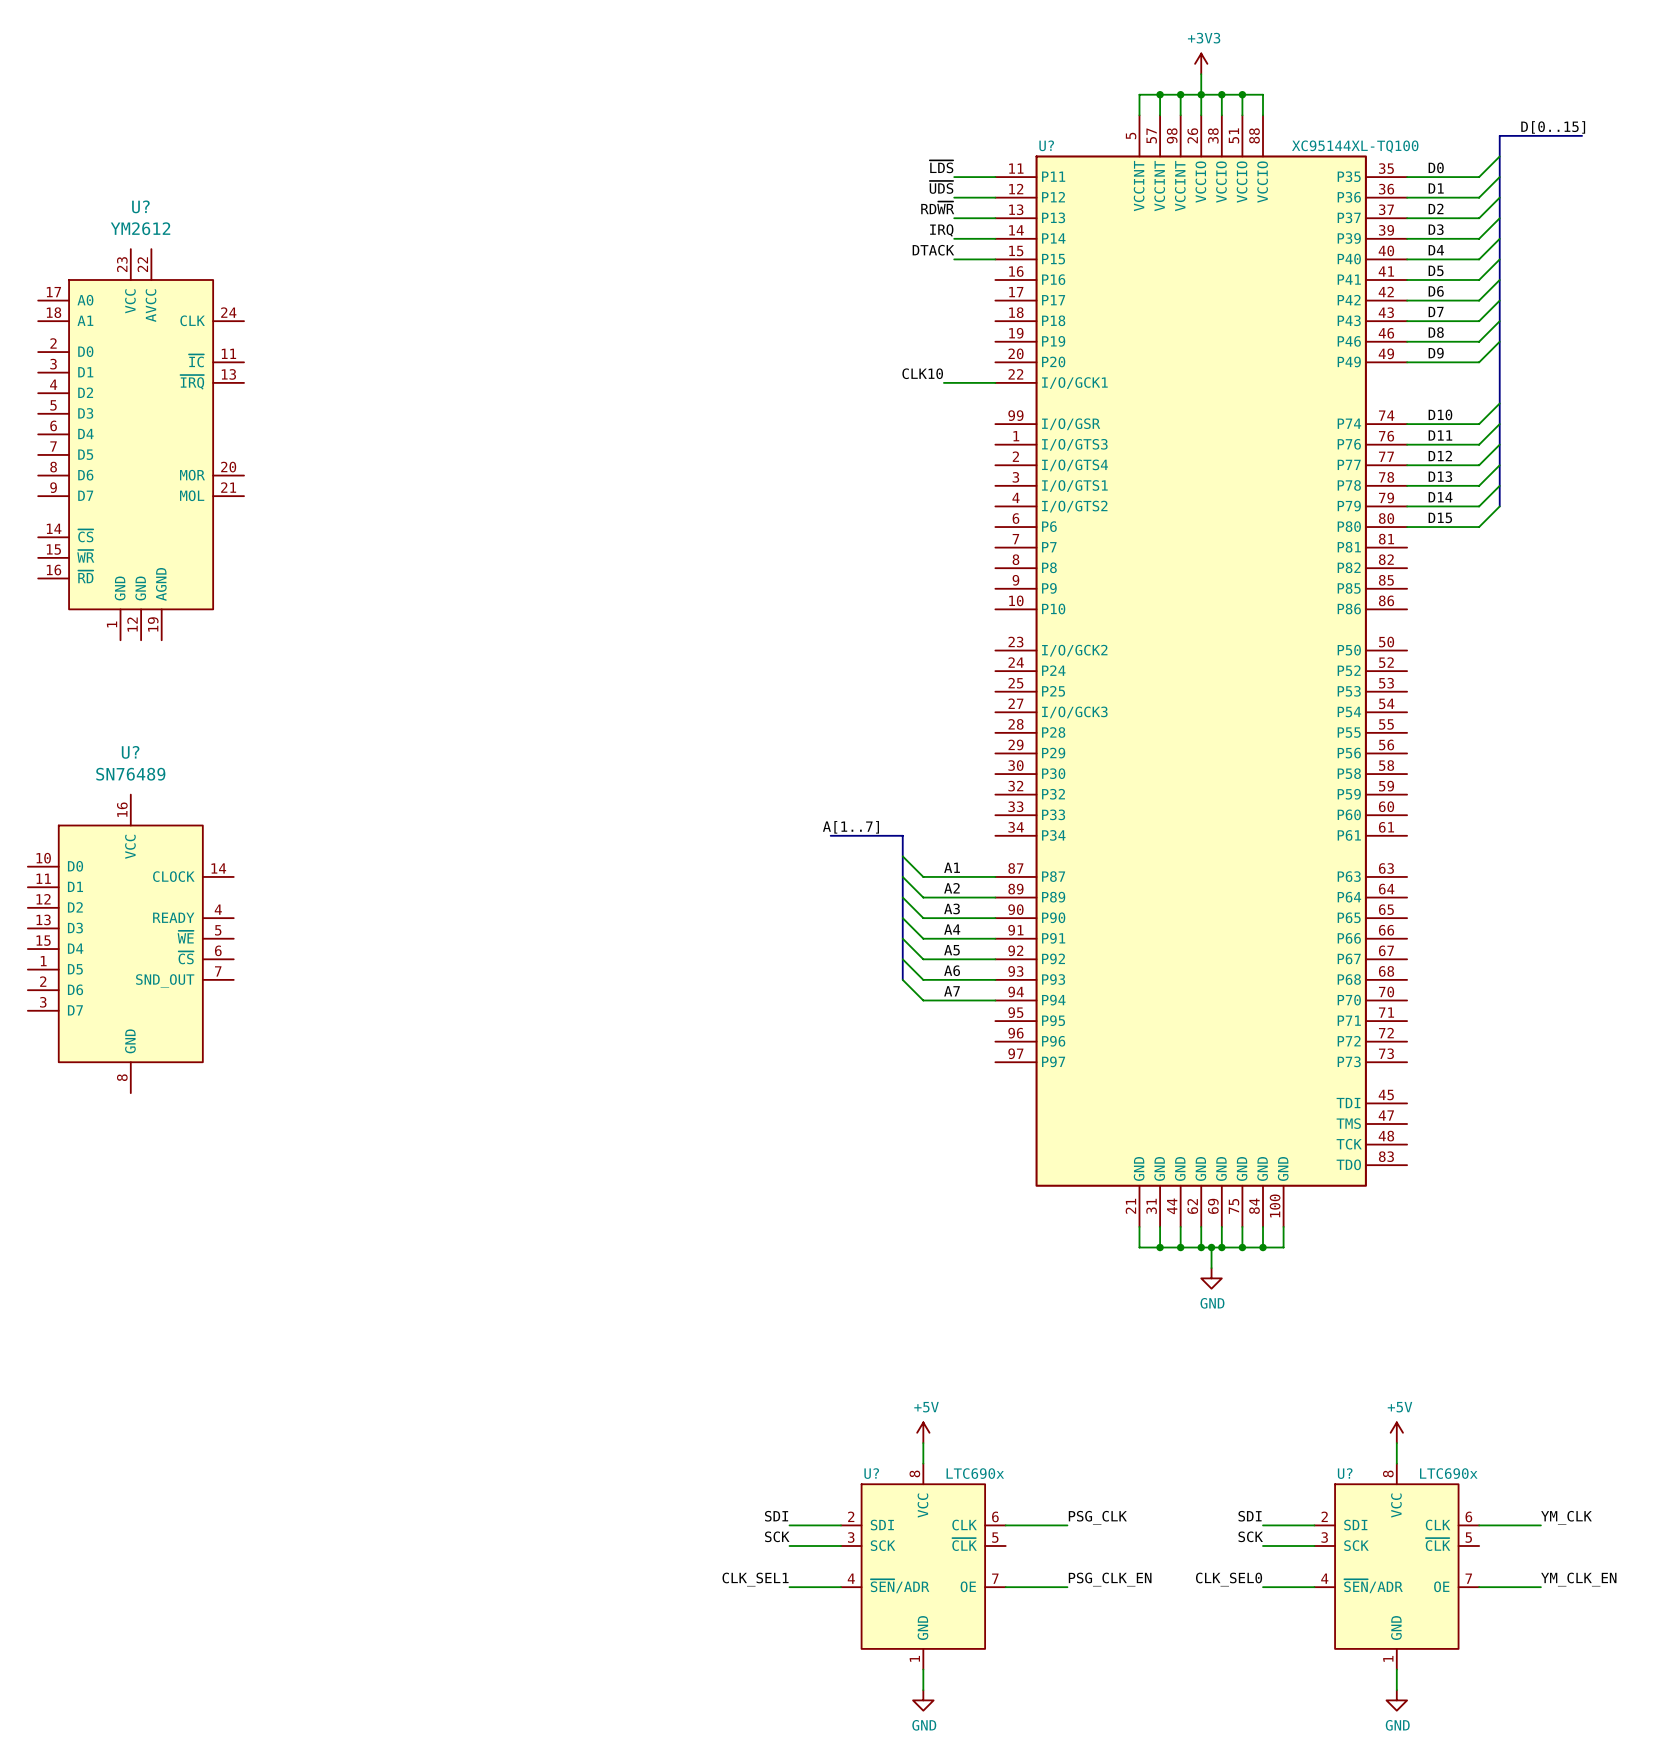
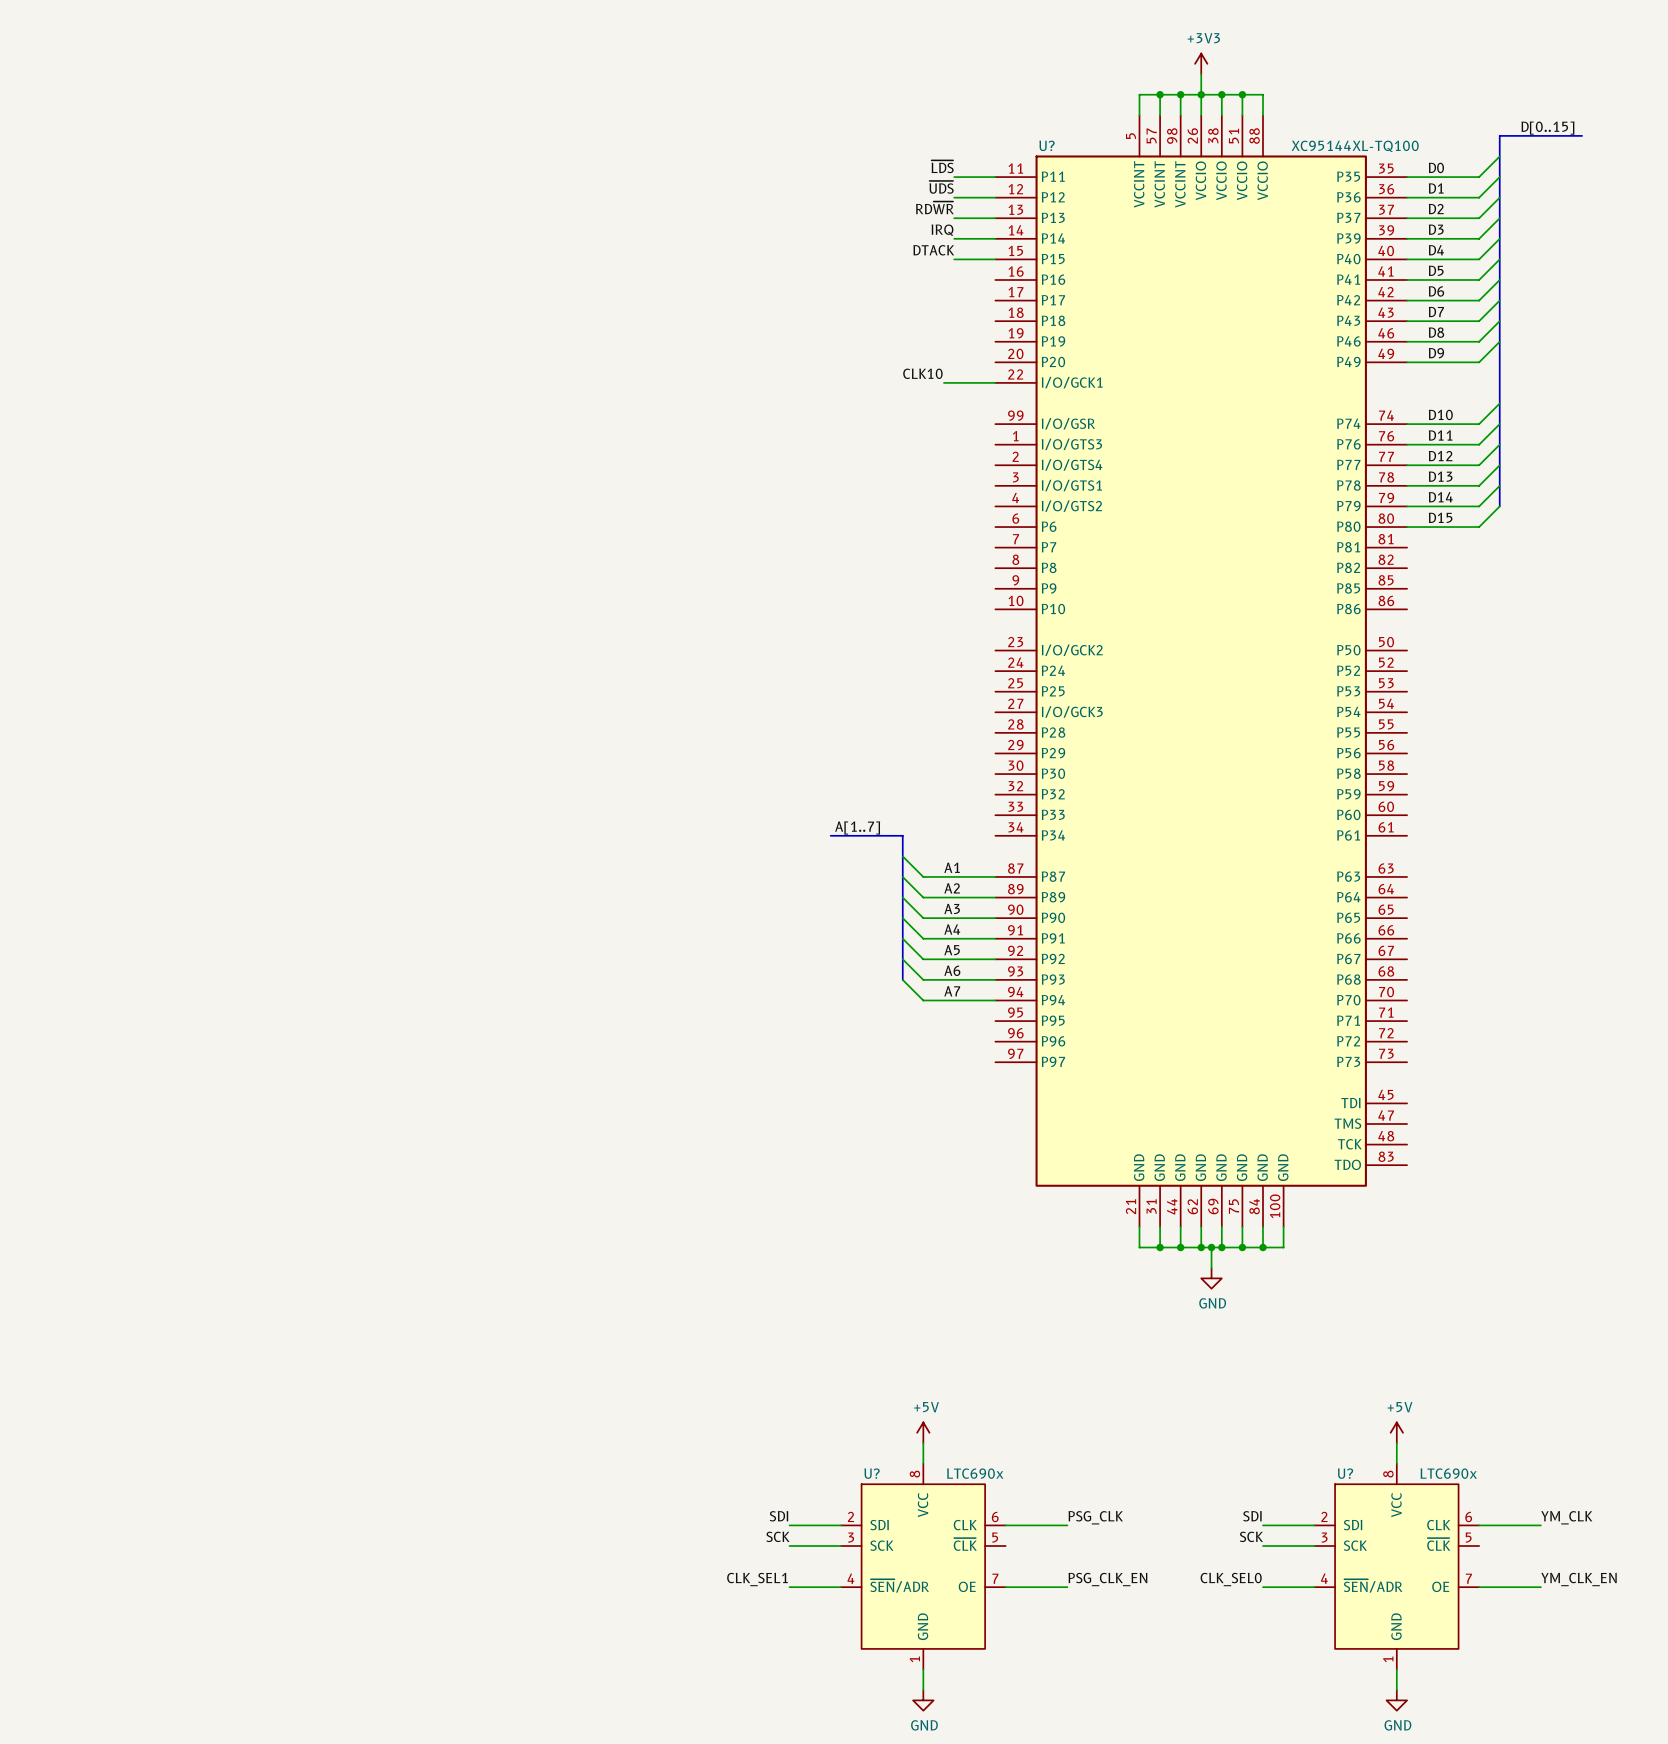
U?: YM2612 (141, 444) -> none
U?: SN76489 (130, 943) -> none

